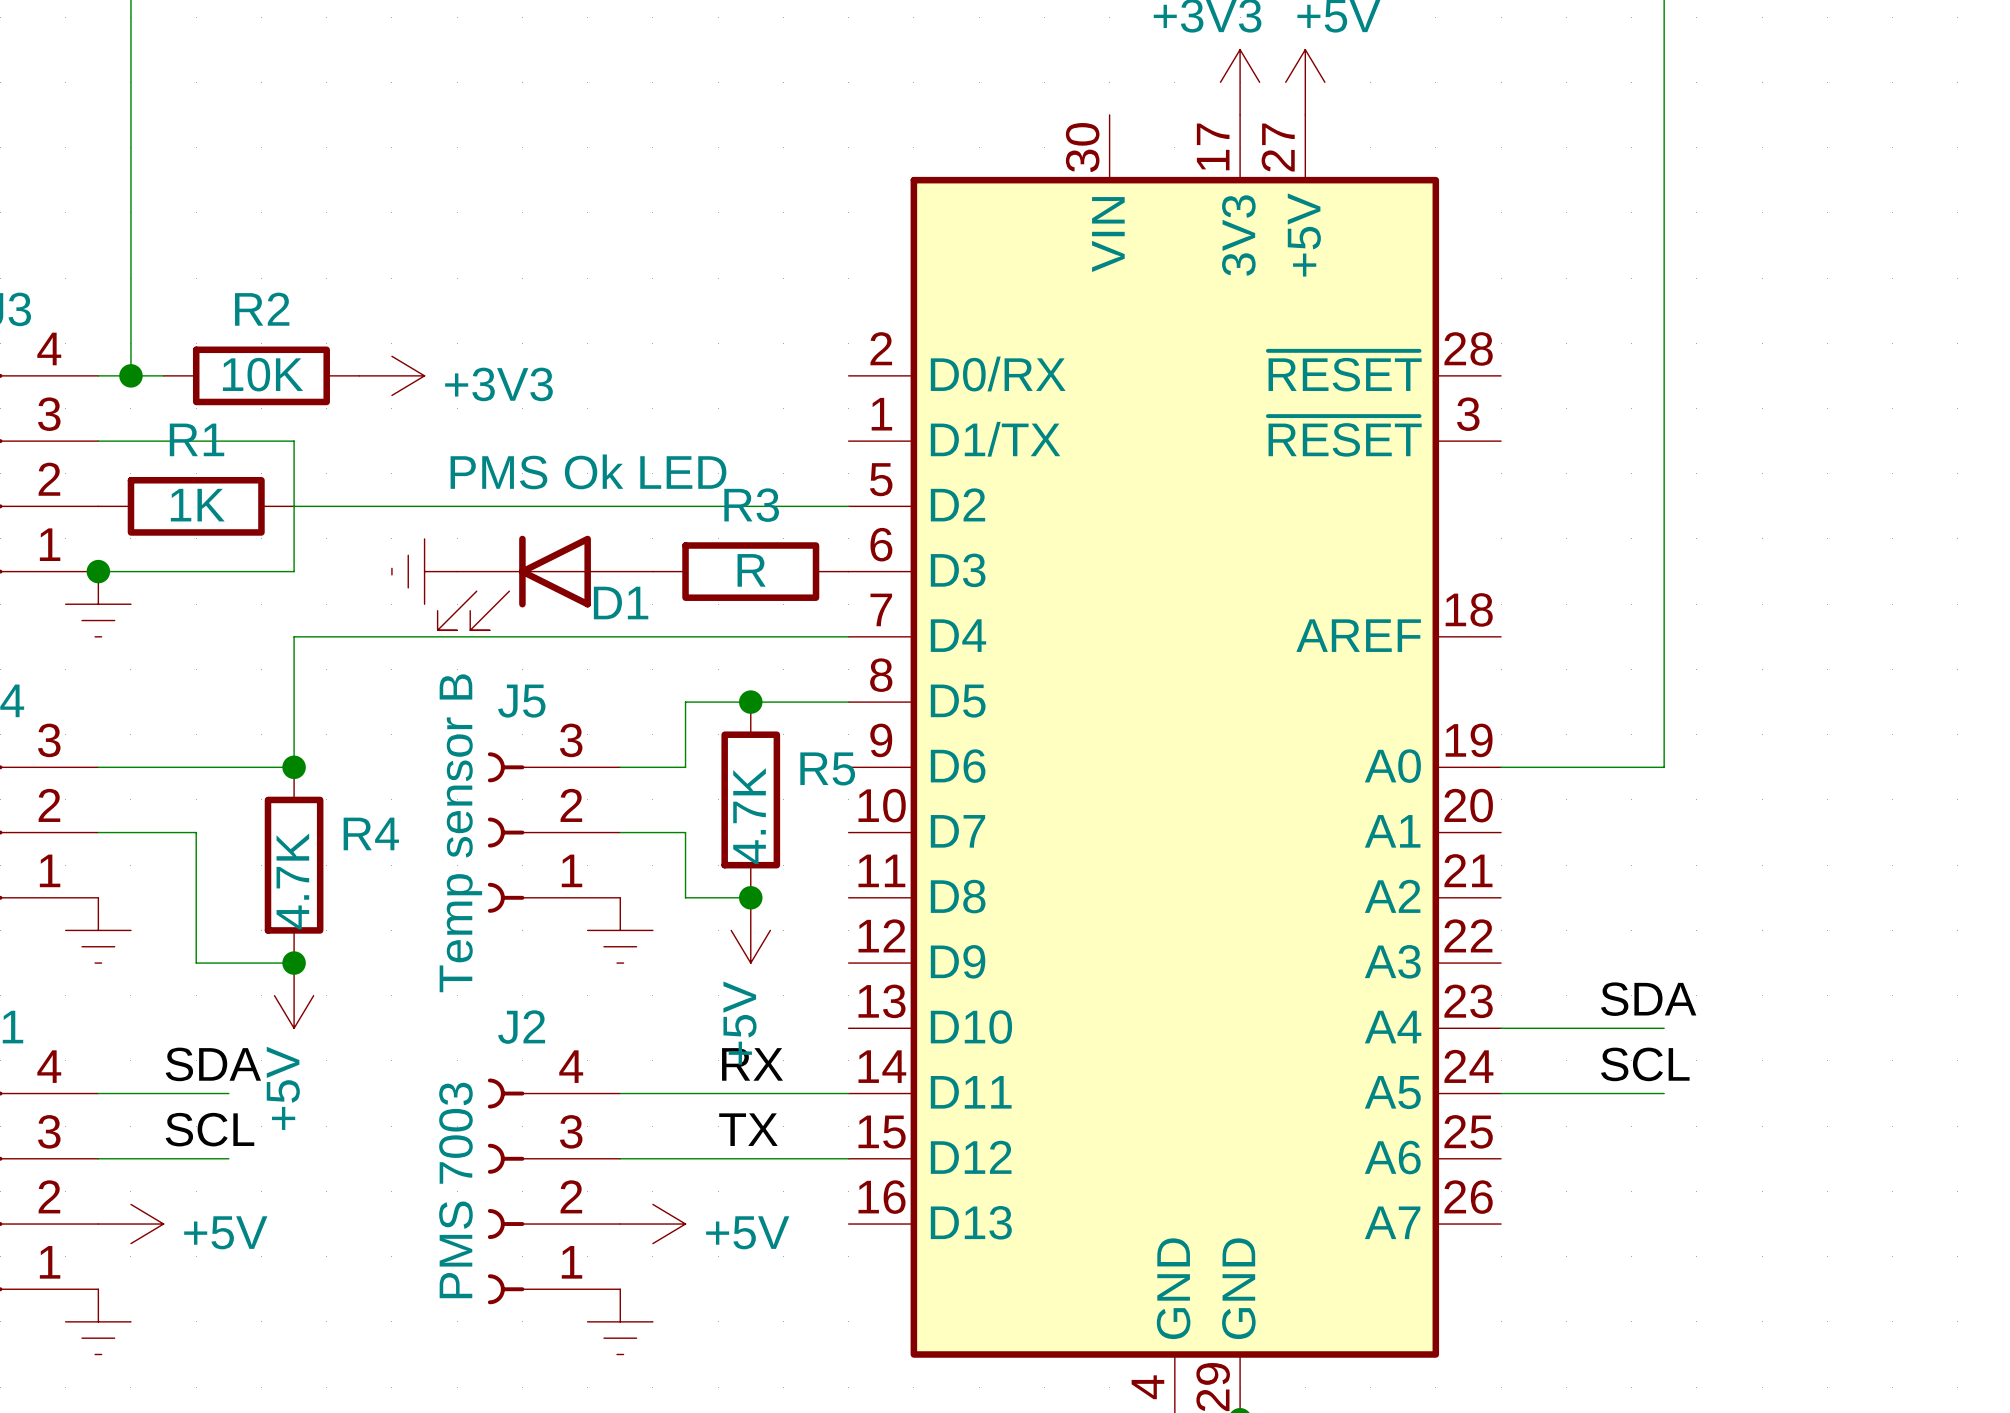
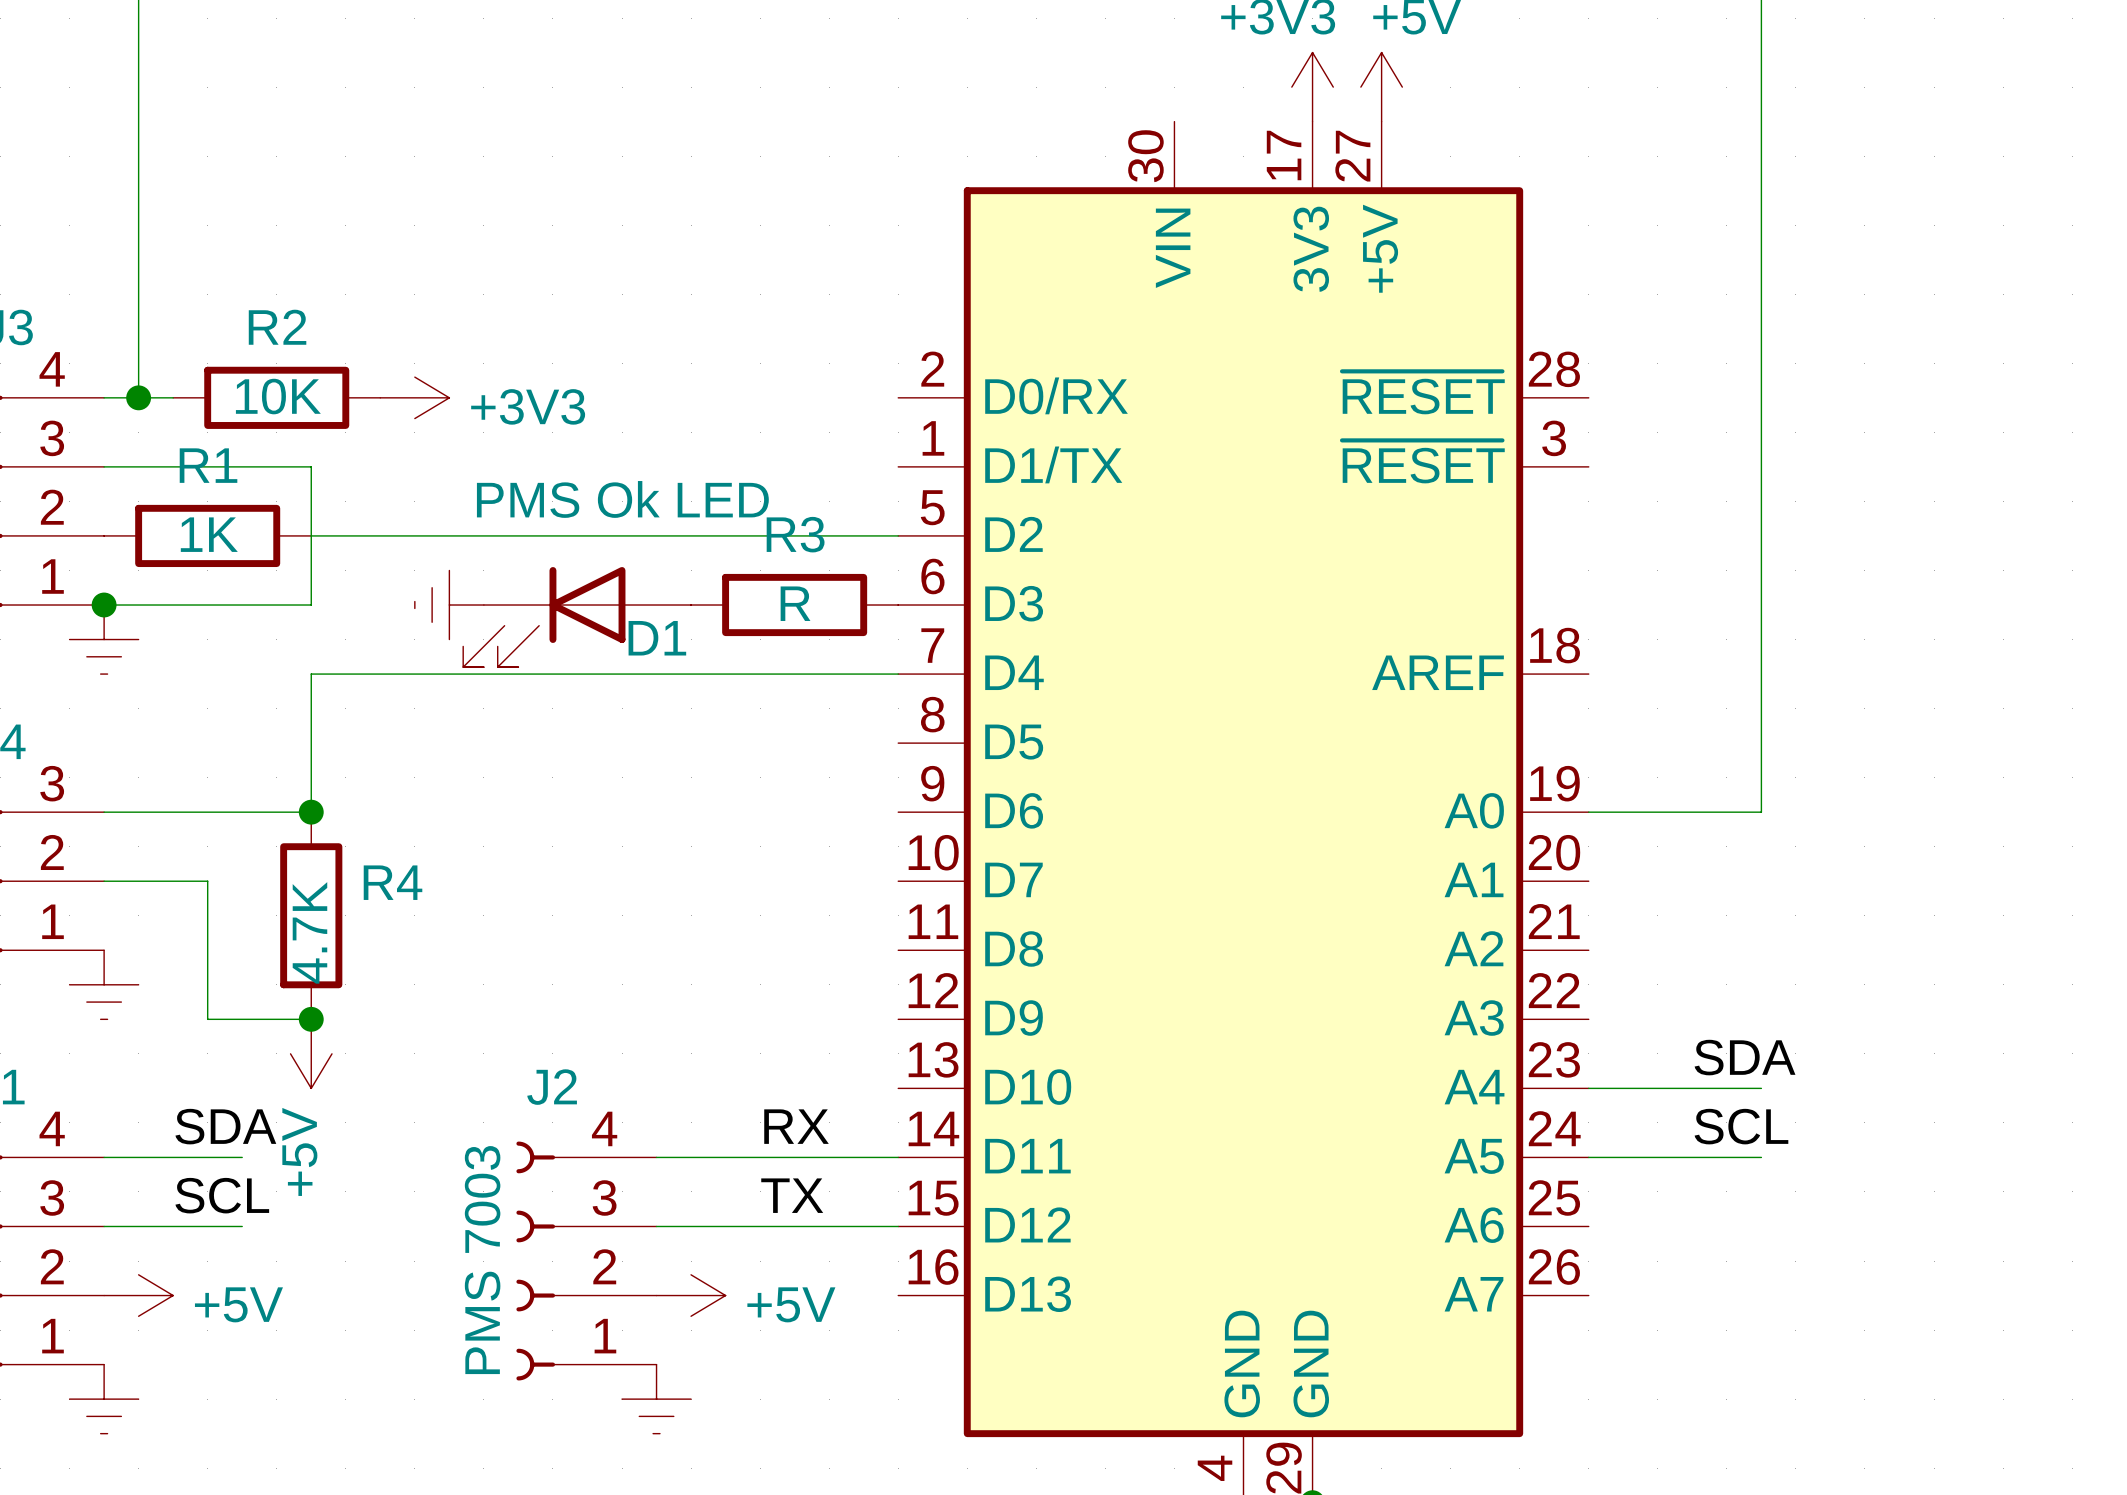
junction: (750, 702) -> none
wire: (848, 702) (685, 702) (685, 767) (620, 767) -> none
R5: 4.7K (750, 799) -> none
J5: Temp sensor B (554, 832) -> none
wire: (620, 832) (685, 832) (685, 897) (750, 897) -> none
junction: (750, 897) -> none
power symbol: (620, 930) -> none
power symbol: +5V (750, 930) -> none

